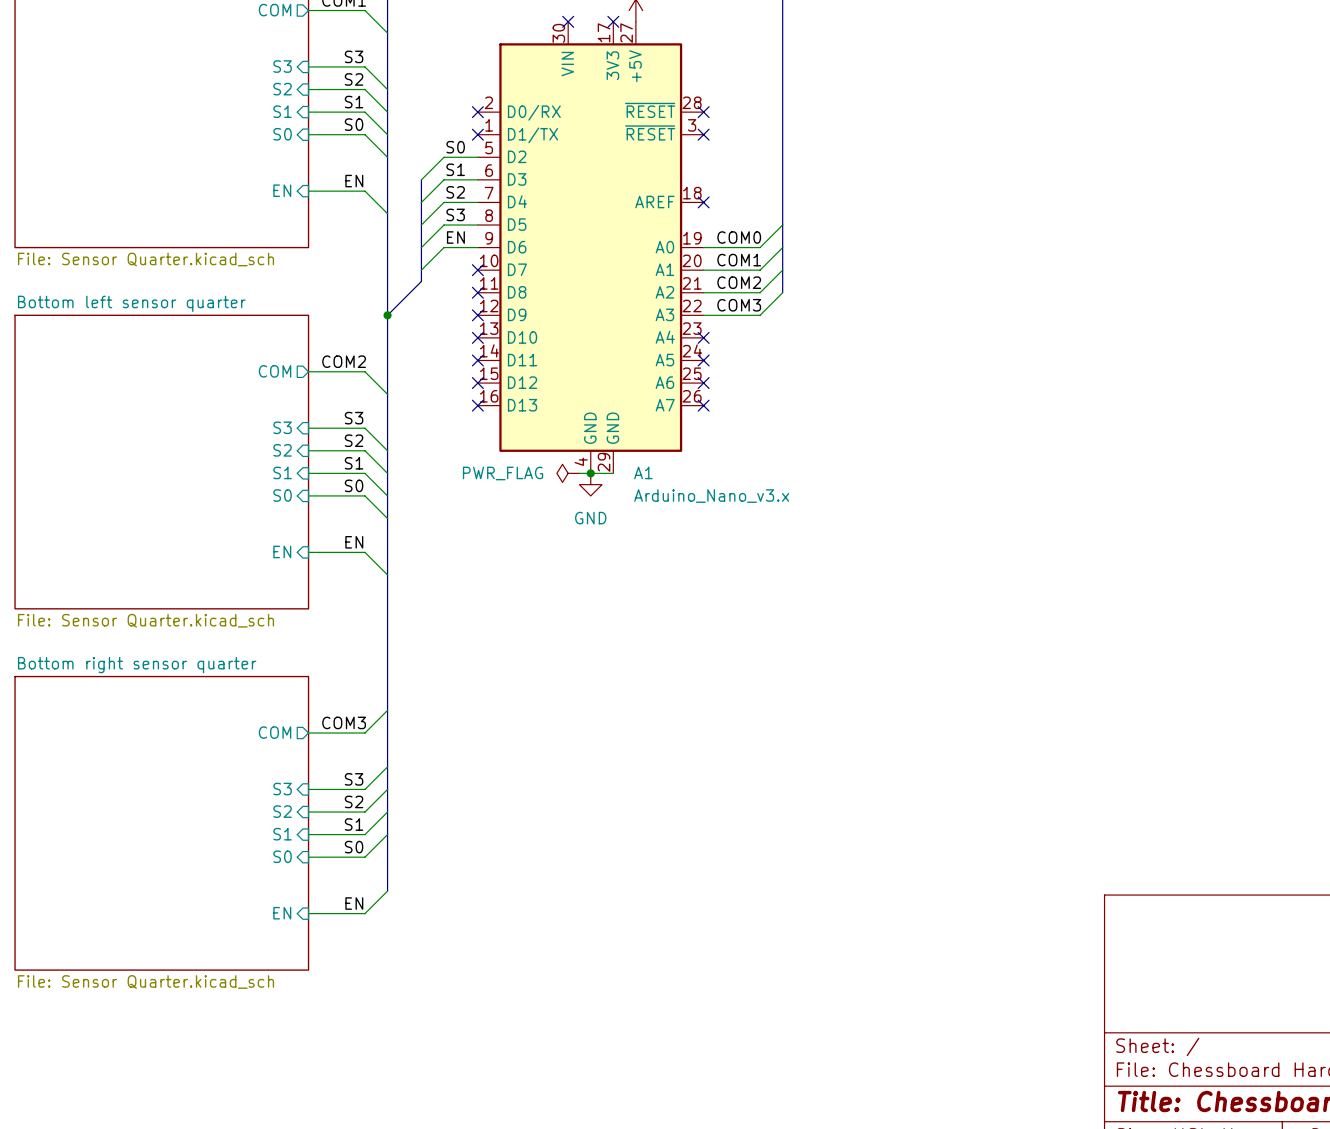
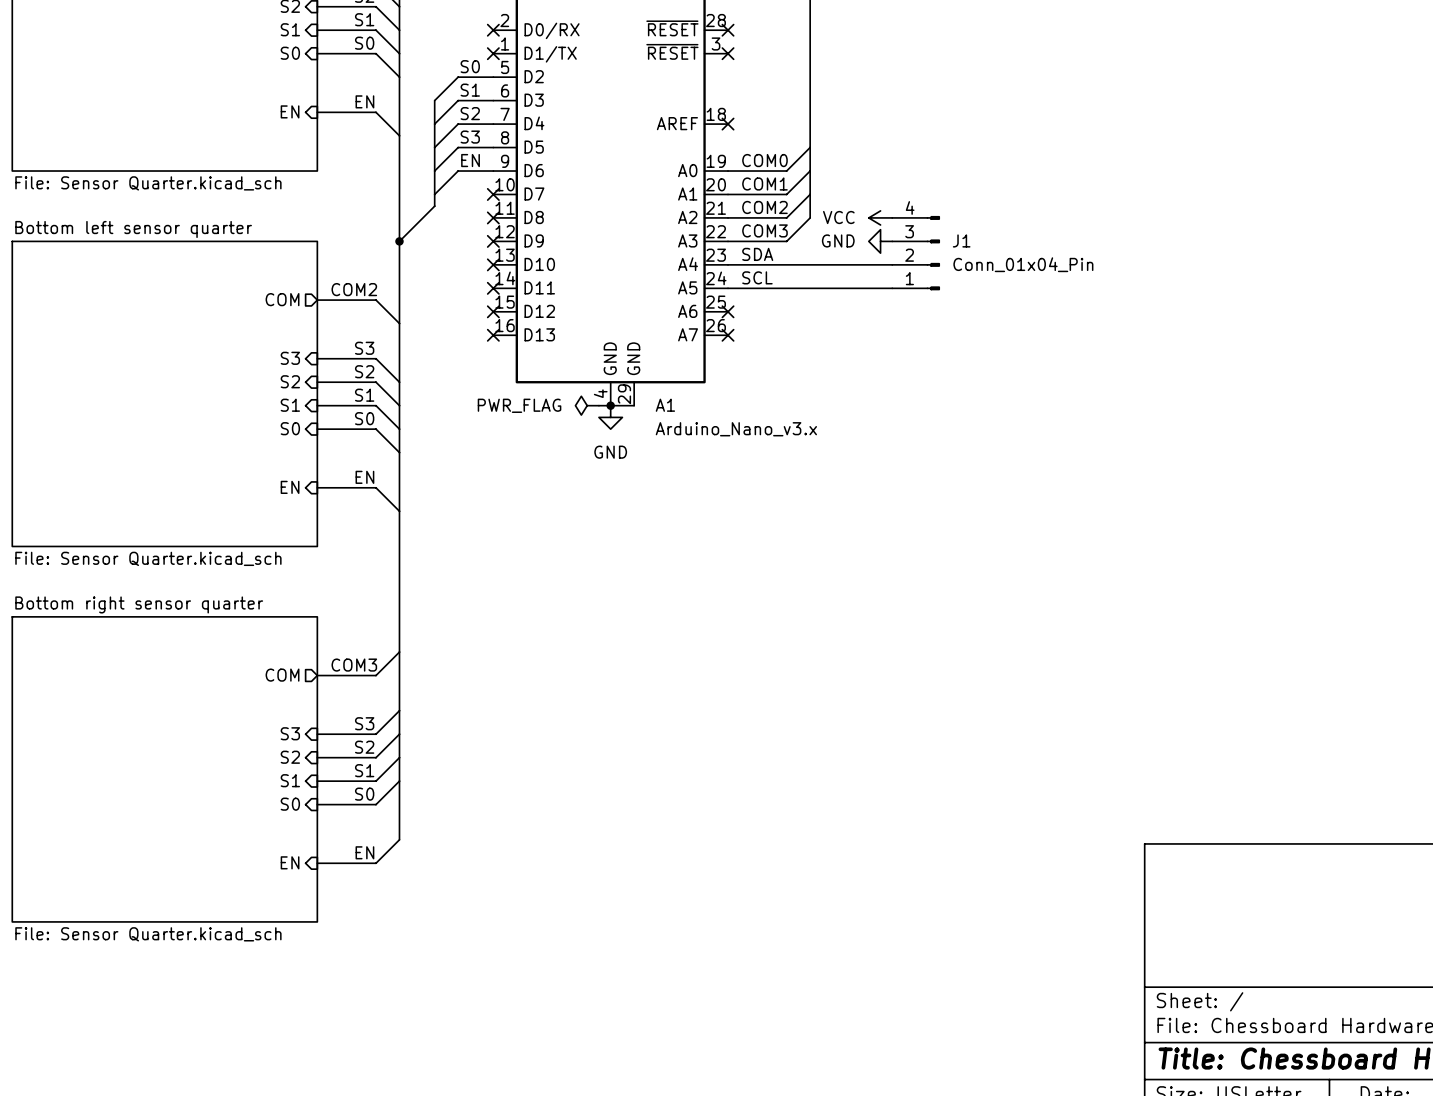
power symbol: none -> VCC (880, 217)
power symbol: none -> GND (880, 241)
J1: none -> Conn_01x04_Pin (916, 253)
label: none -> SDA (757, 254)
wire: none -> (728, 264) (892, 264)
no-connect mark: (703, 337) -> none
label: none -> SCL (757, 277)
wire: none -> (728, 288) (892, 288)
no-connect mark: (703, 360) -> none

